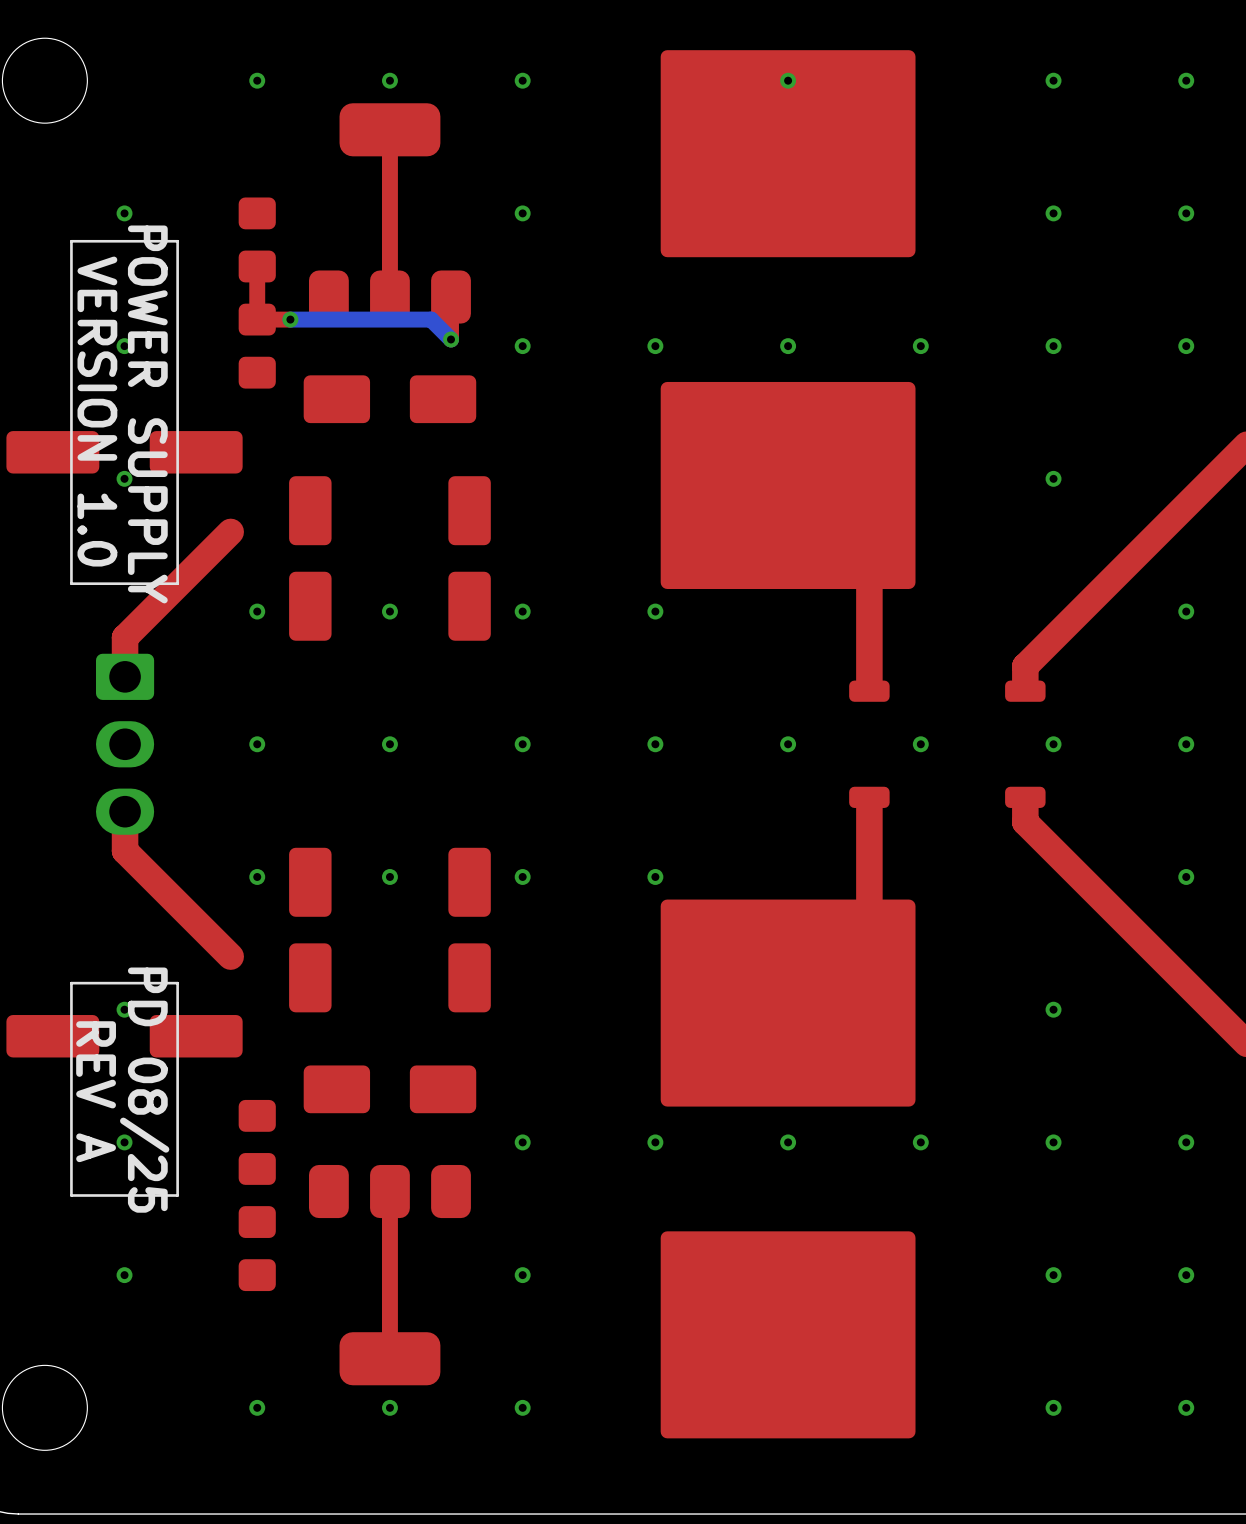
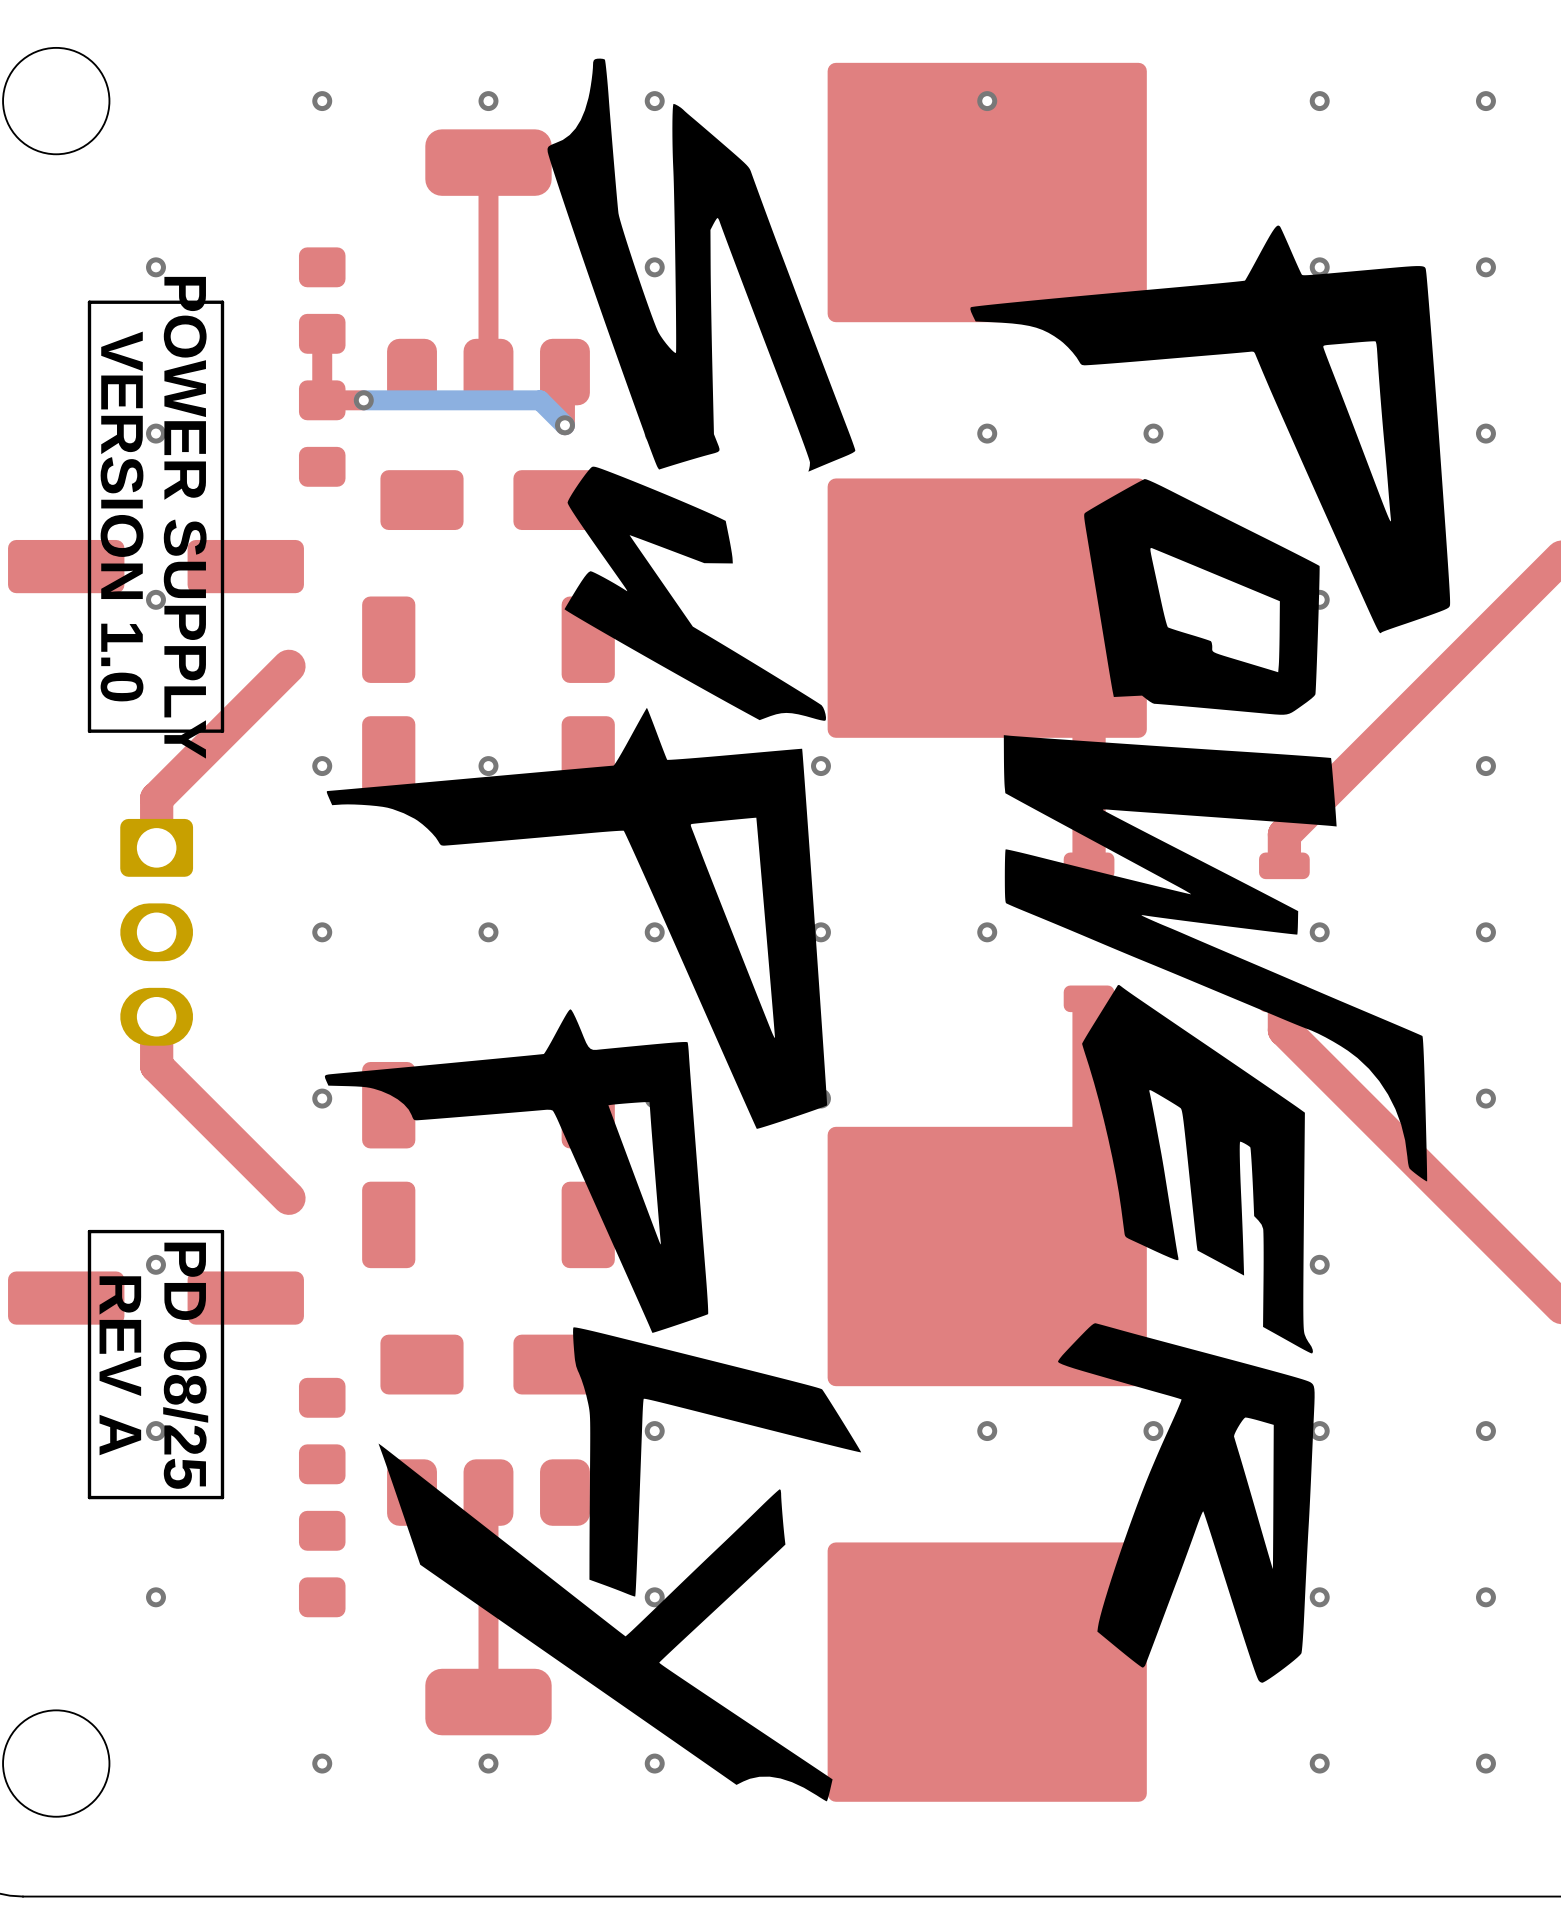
drawing: none -> [324, 58, 1451, 1802]

